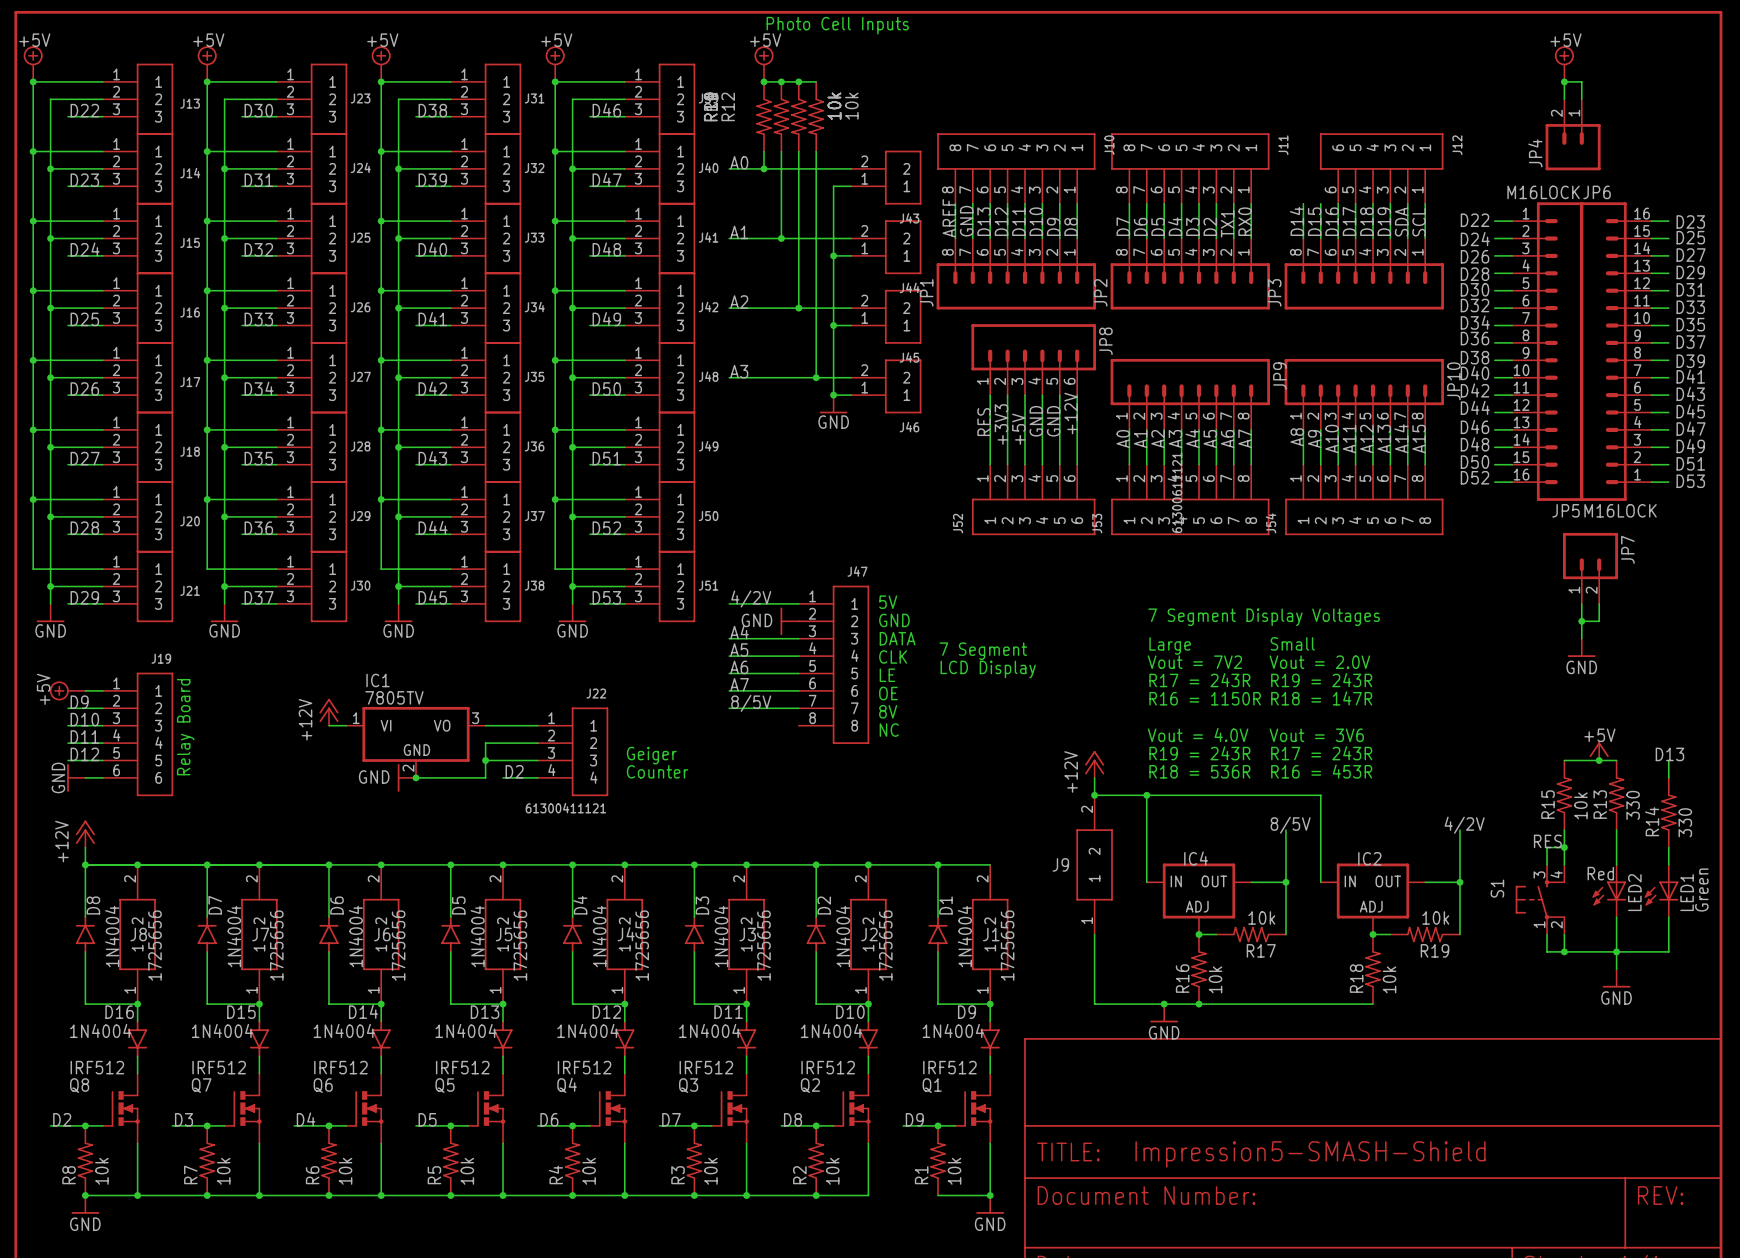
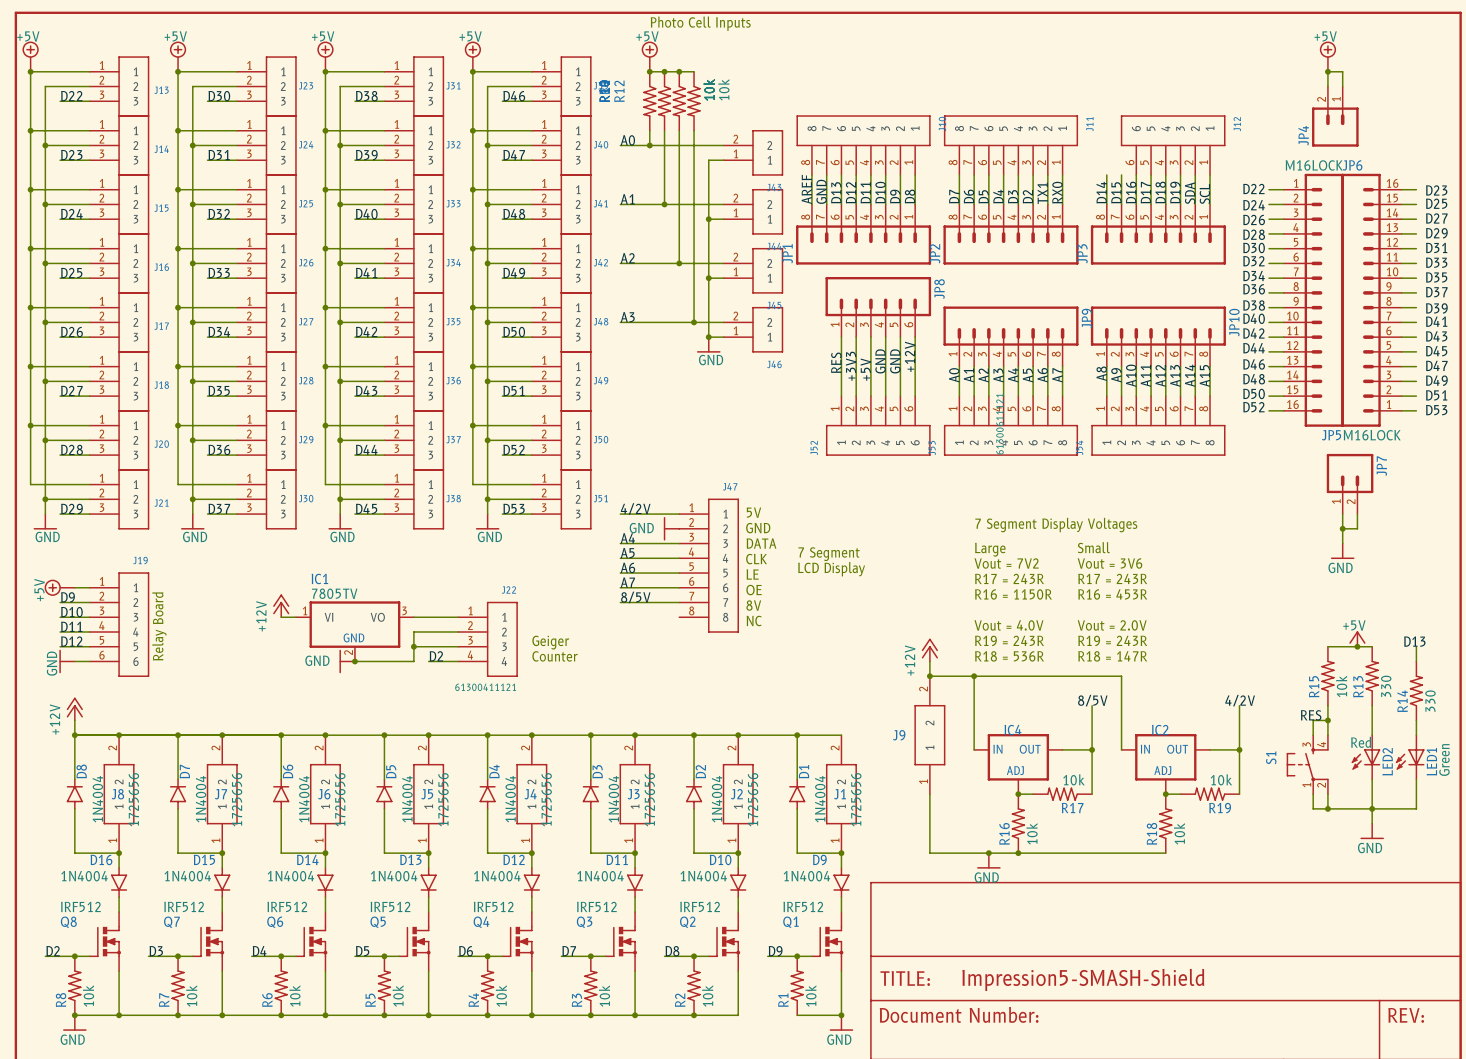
text: Vout = 2.0V (1319, 662) -> Vout = 3V6 (1110, 563)
text: R19 = 243R (1321, 680) -> R17 = 243R (1112, 578)
text: R18 = 147R (1321, 698) -> R16 = 453R (1112, 594)
text: Vout = 3V6 (1316, 735) -> Vout = 2.0V (1112, 625)
text: R17 = 243R (1321, 753) -> R19 = 243R (1112, 640)
text: R16 = 453R (1321, 771) -> R18 = 147R (1112, 656)

